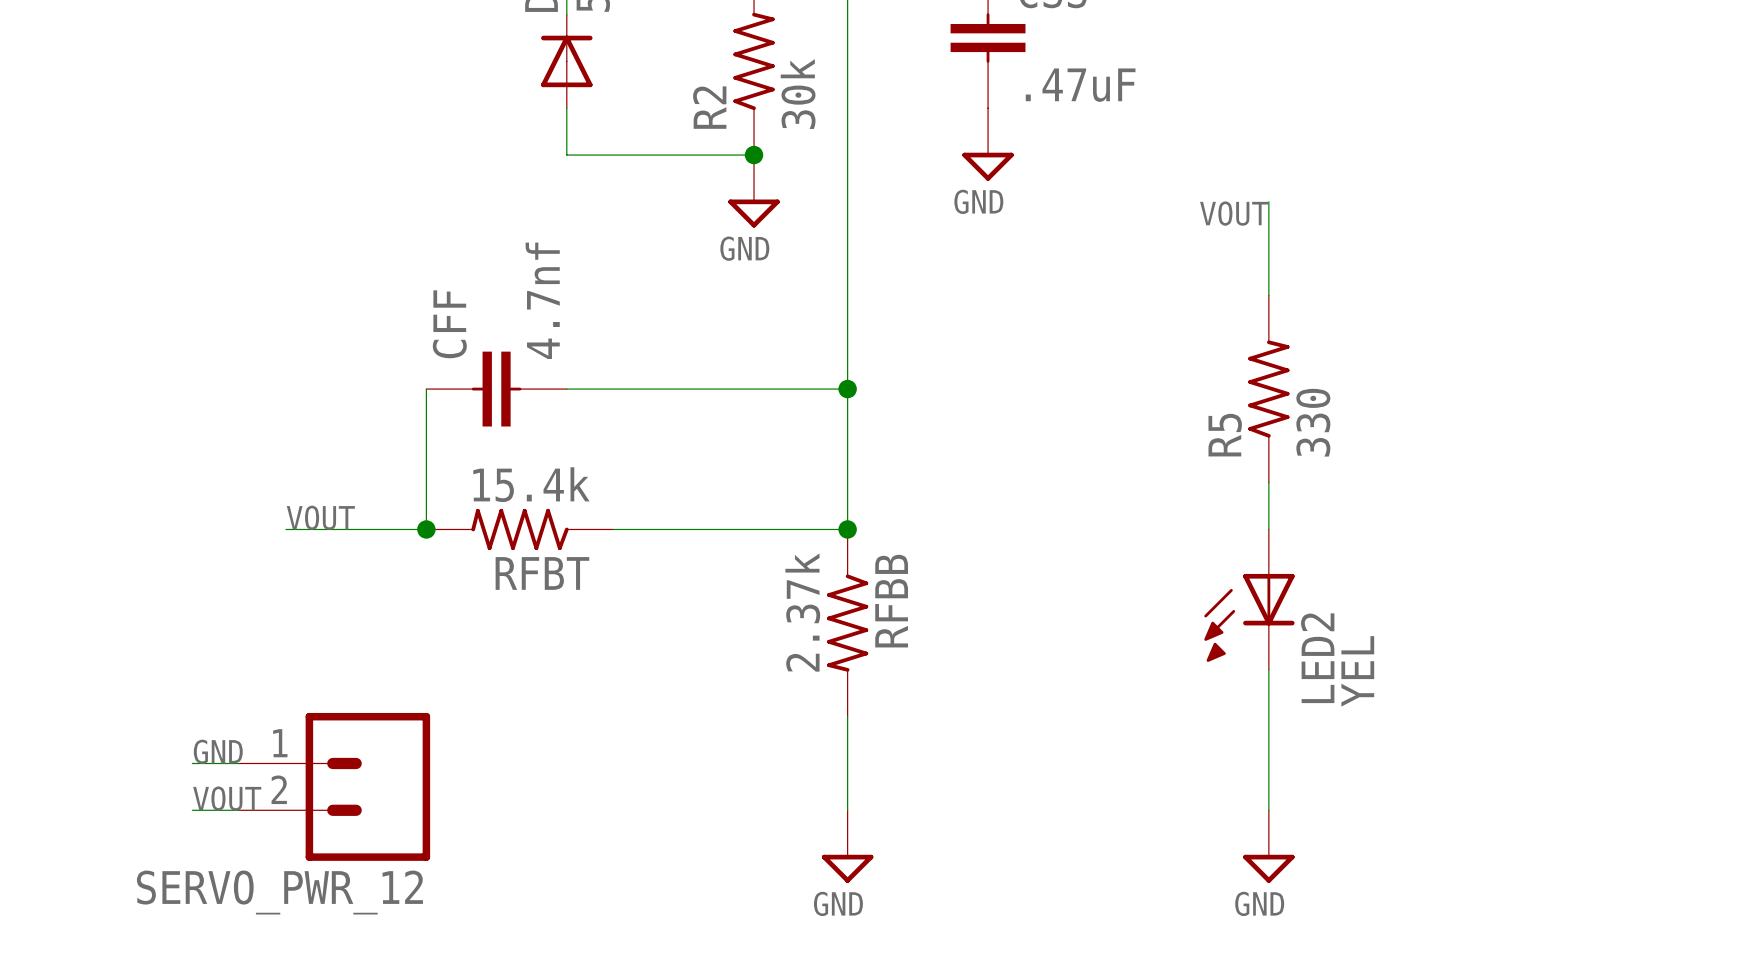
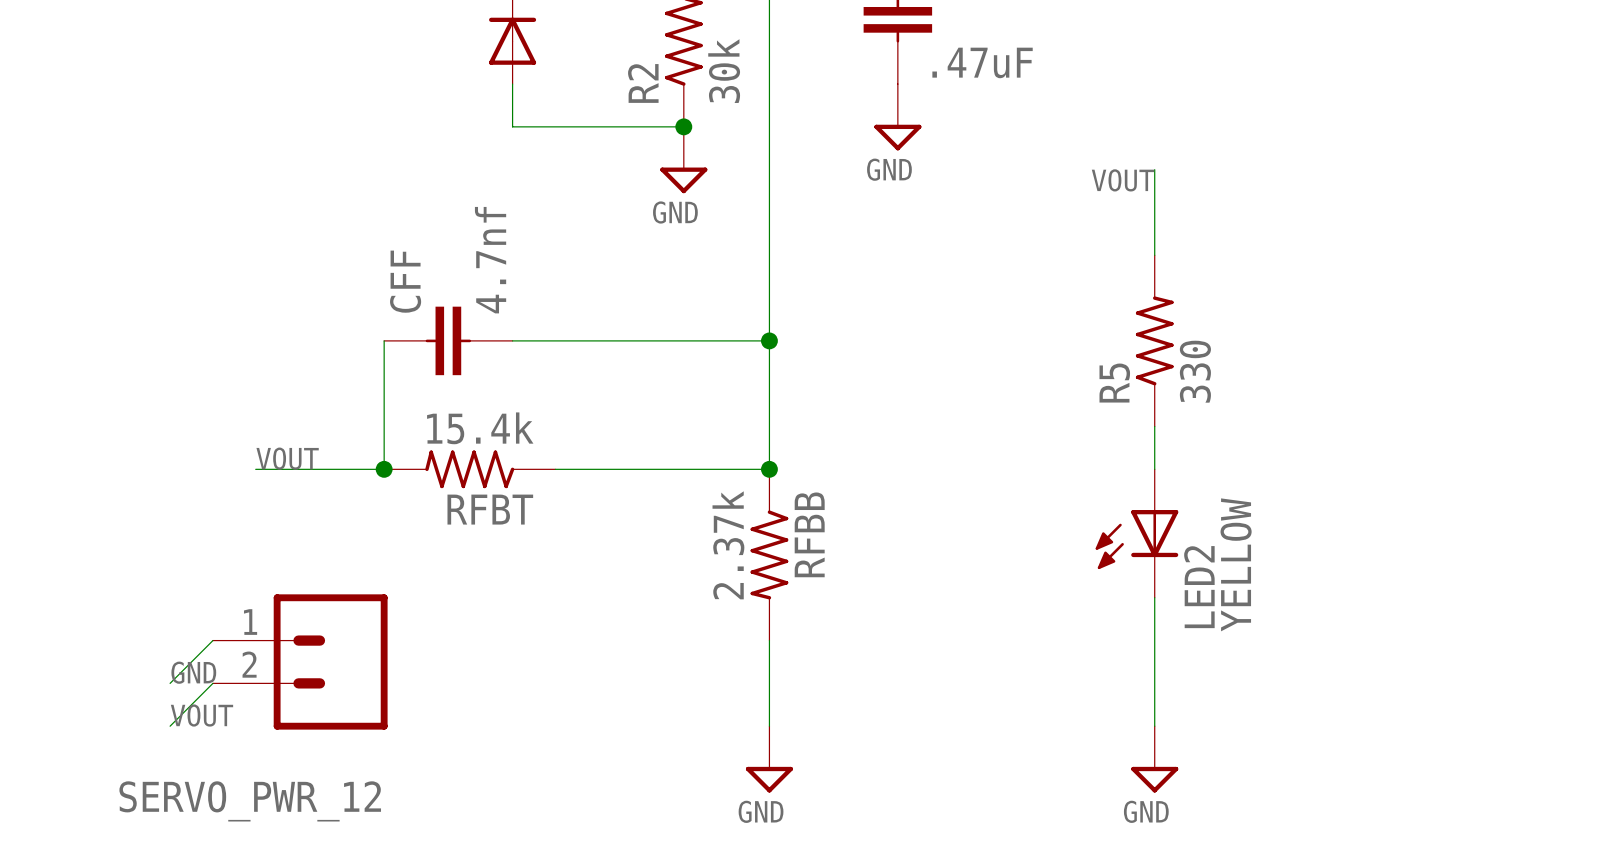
LED2 symbol: [1204, 529, 1295, 670] -> [1095, 469, 1179, 598]
LED2 value: YEL (1357, 671) -> YELLOW (1236, 564)
wire: (192, 763) (239, 763) -> (170, 683) (212, 640)
SERVO_PWR_12 position: (334, 786) -> (300, 661)
wire: (192, 810) (239, 810) -> (170, 726) (212, 683)

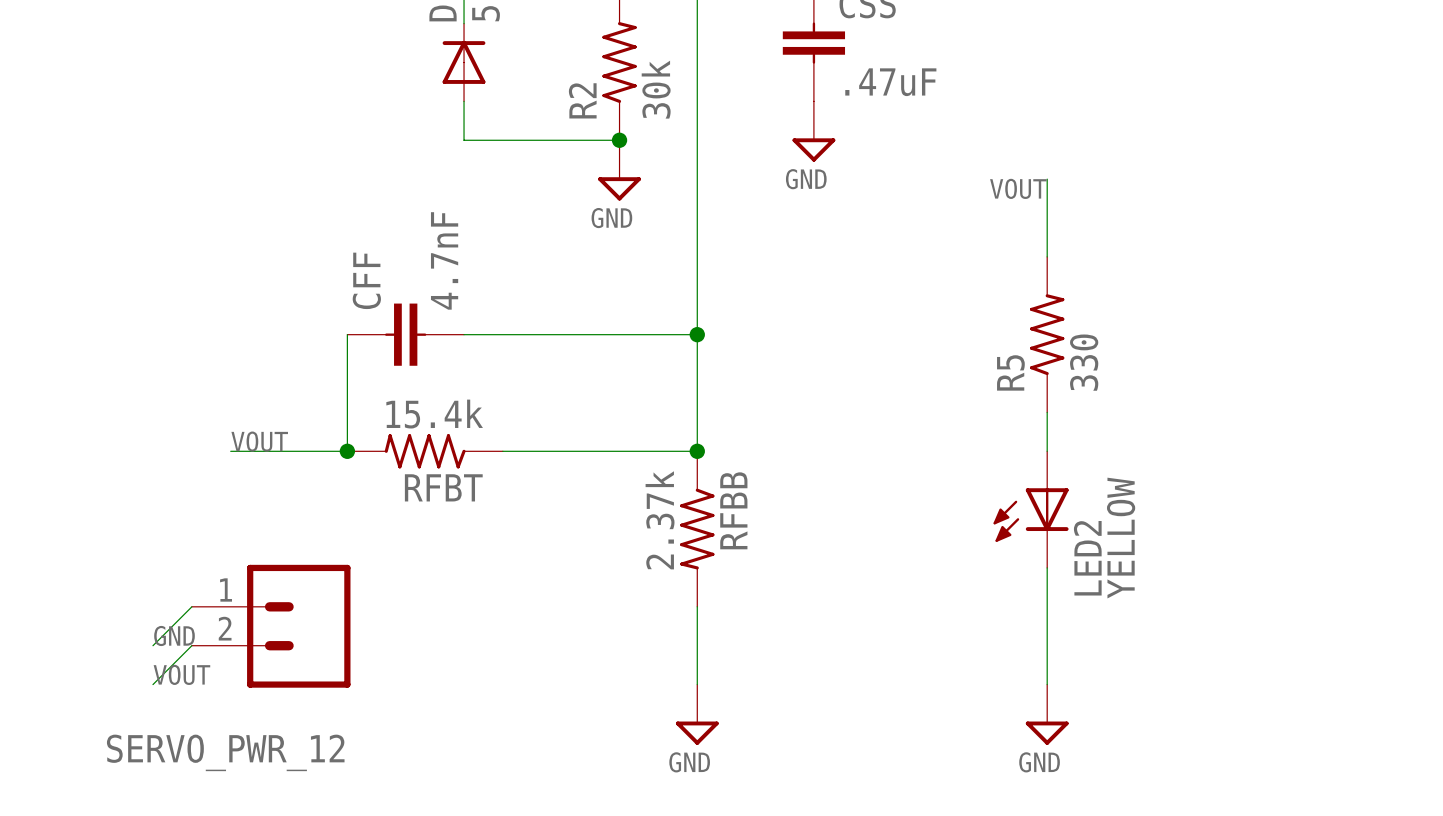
CFF value: 4.7nf (490, 260) -> 4.7nF (444, 260)

